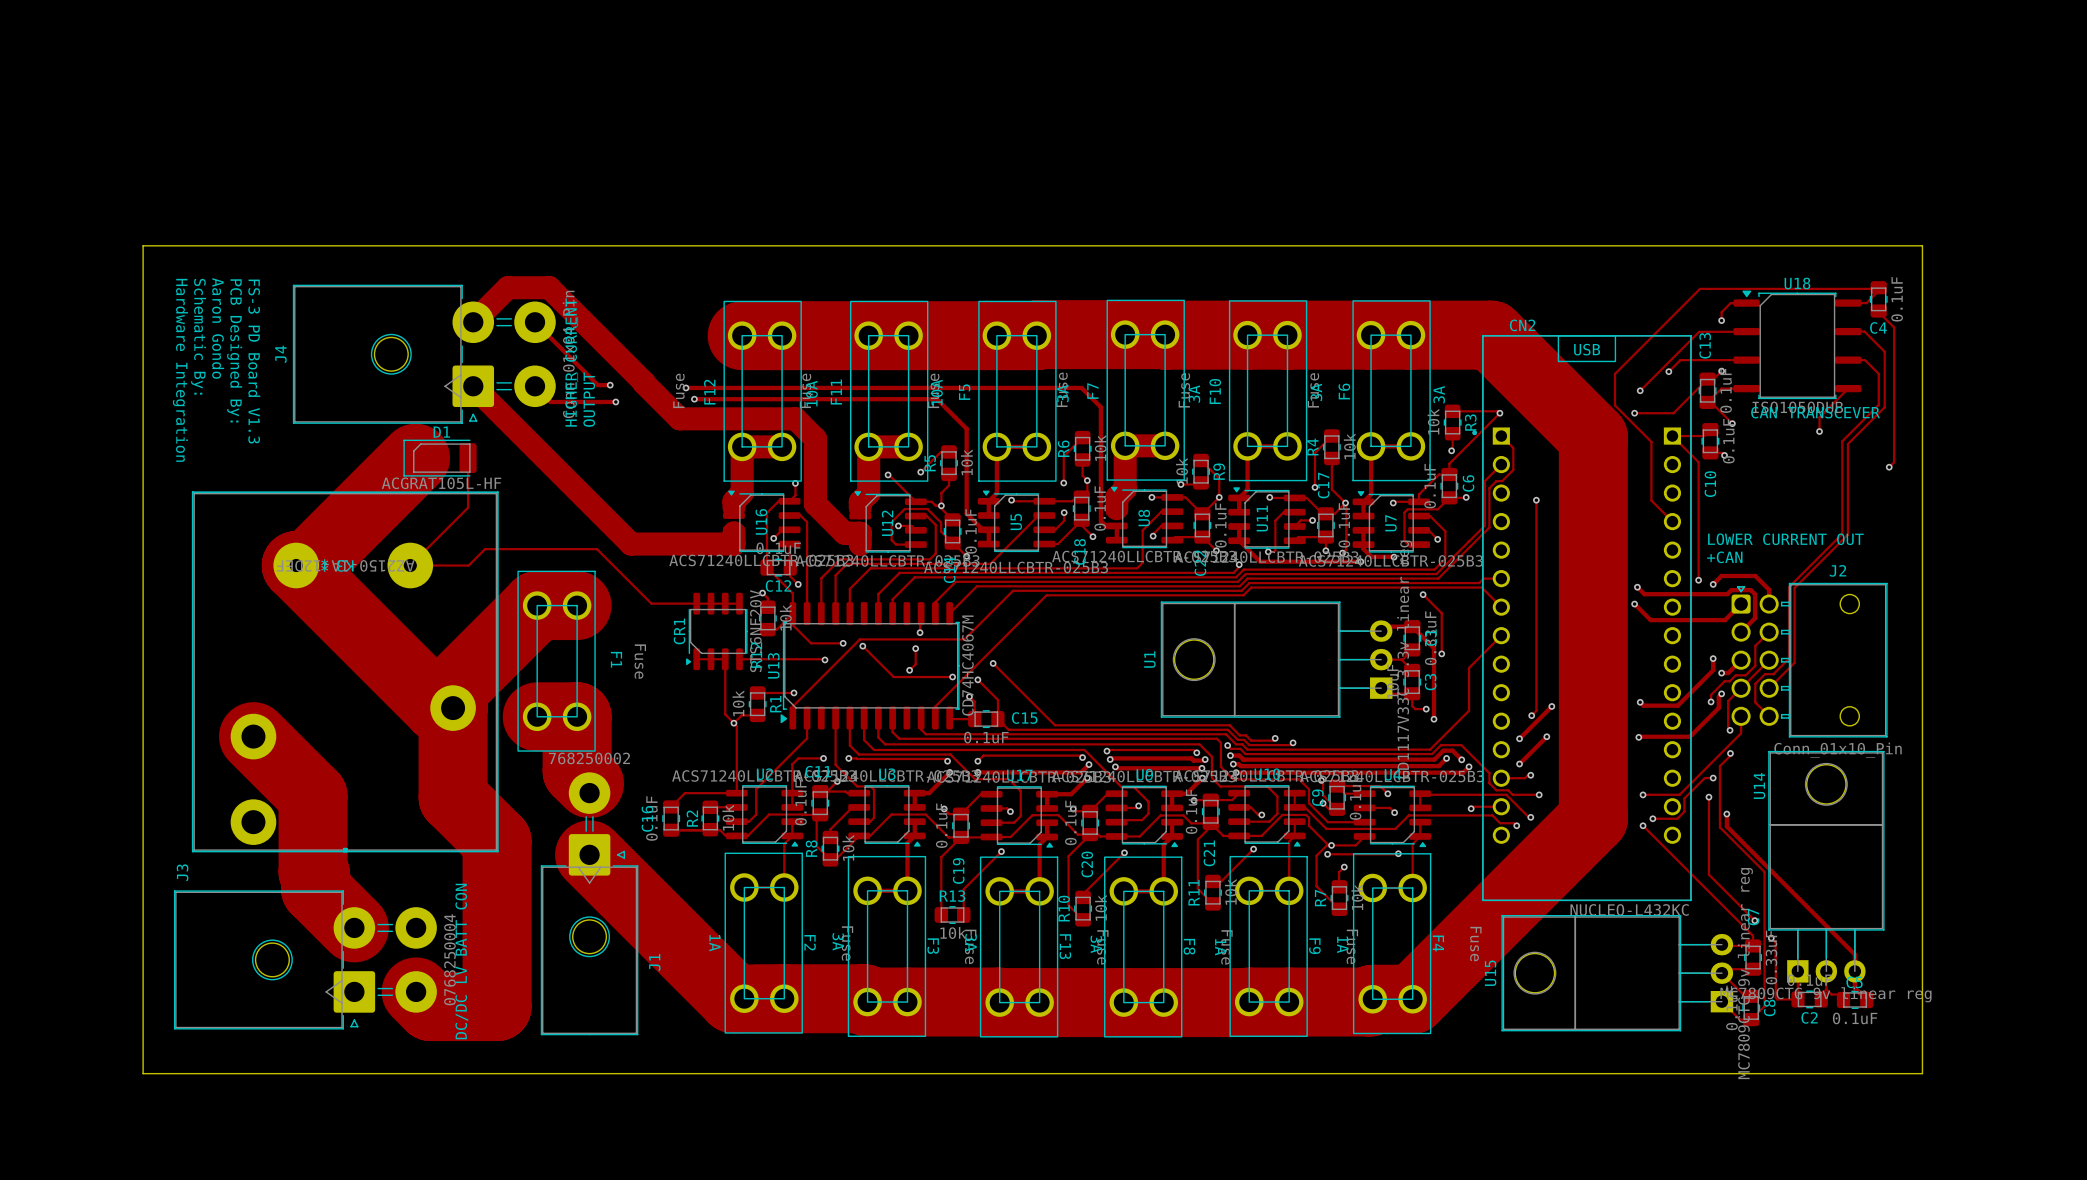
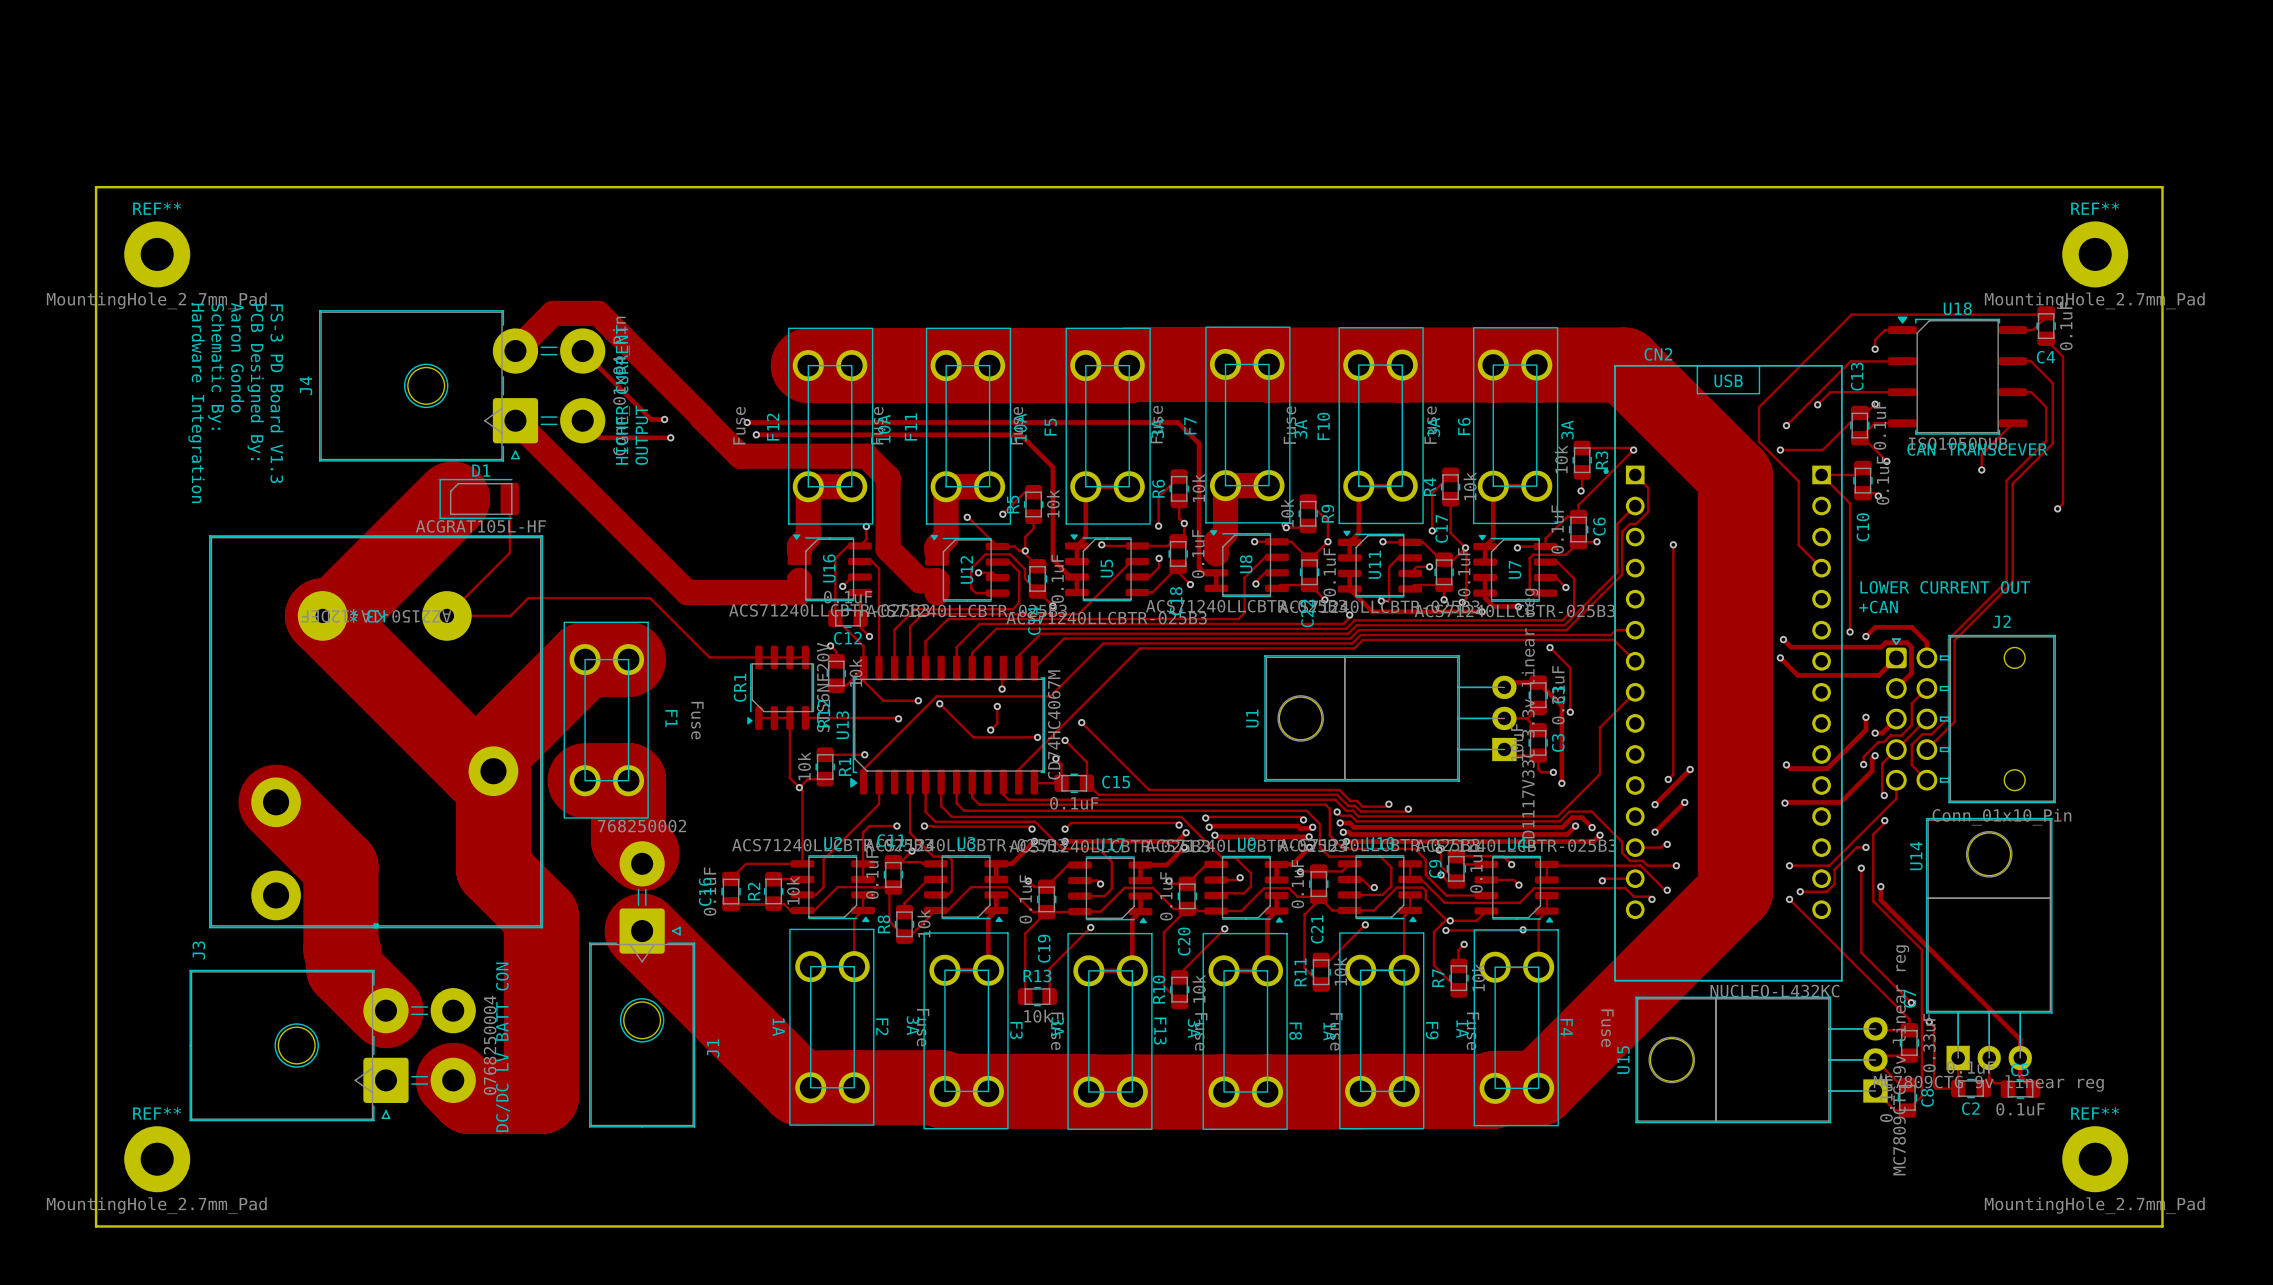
REF**: none -> MountingHole_2.7mm_Pad (157, 254)
REF**: none -> MountingHole_2.7mm_Pad (2095, 254)
board edge: (143, 245) (1922, 245) (1922, 1073) (143, 1073) (143, 245) -> (96, 187) (96, 1226) (2162, 1226) (2162, 187) (96, 187)
REF**: none -> MountingHole_2.7mm_Pad (157, 1159)
REF**: none -> MountingHole_2.7mm_Pad (2095, 1159)

